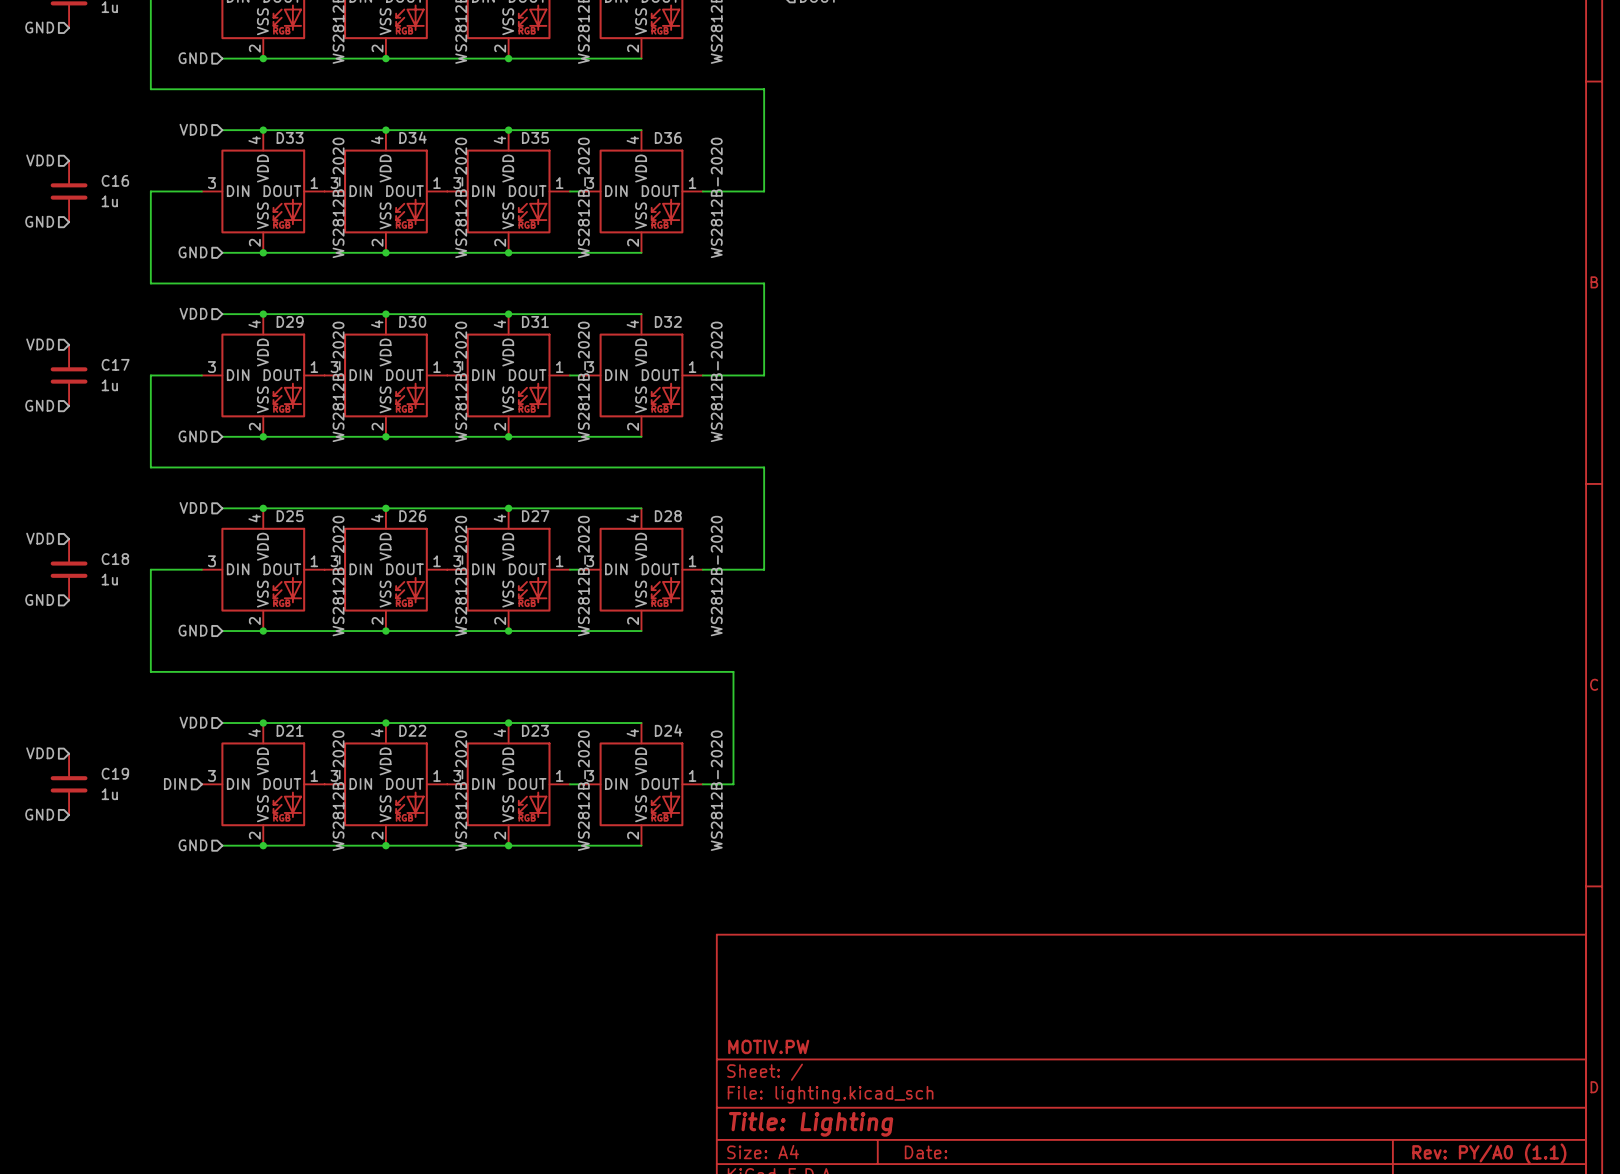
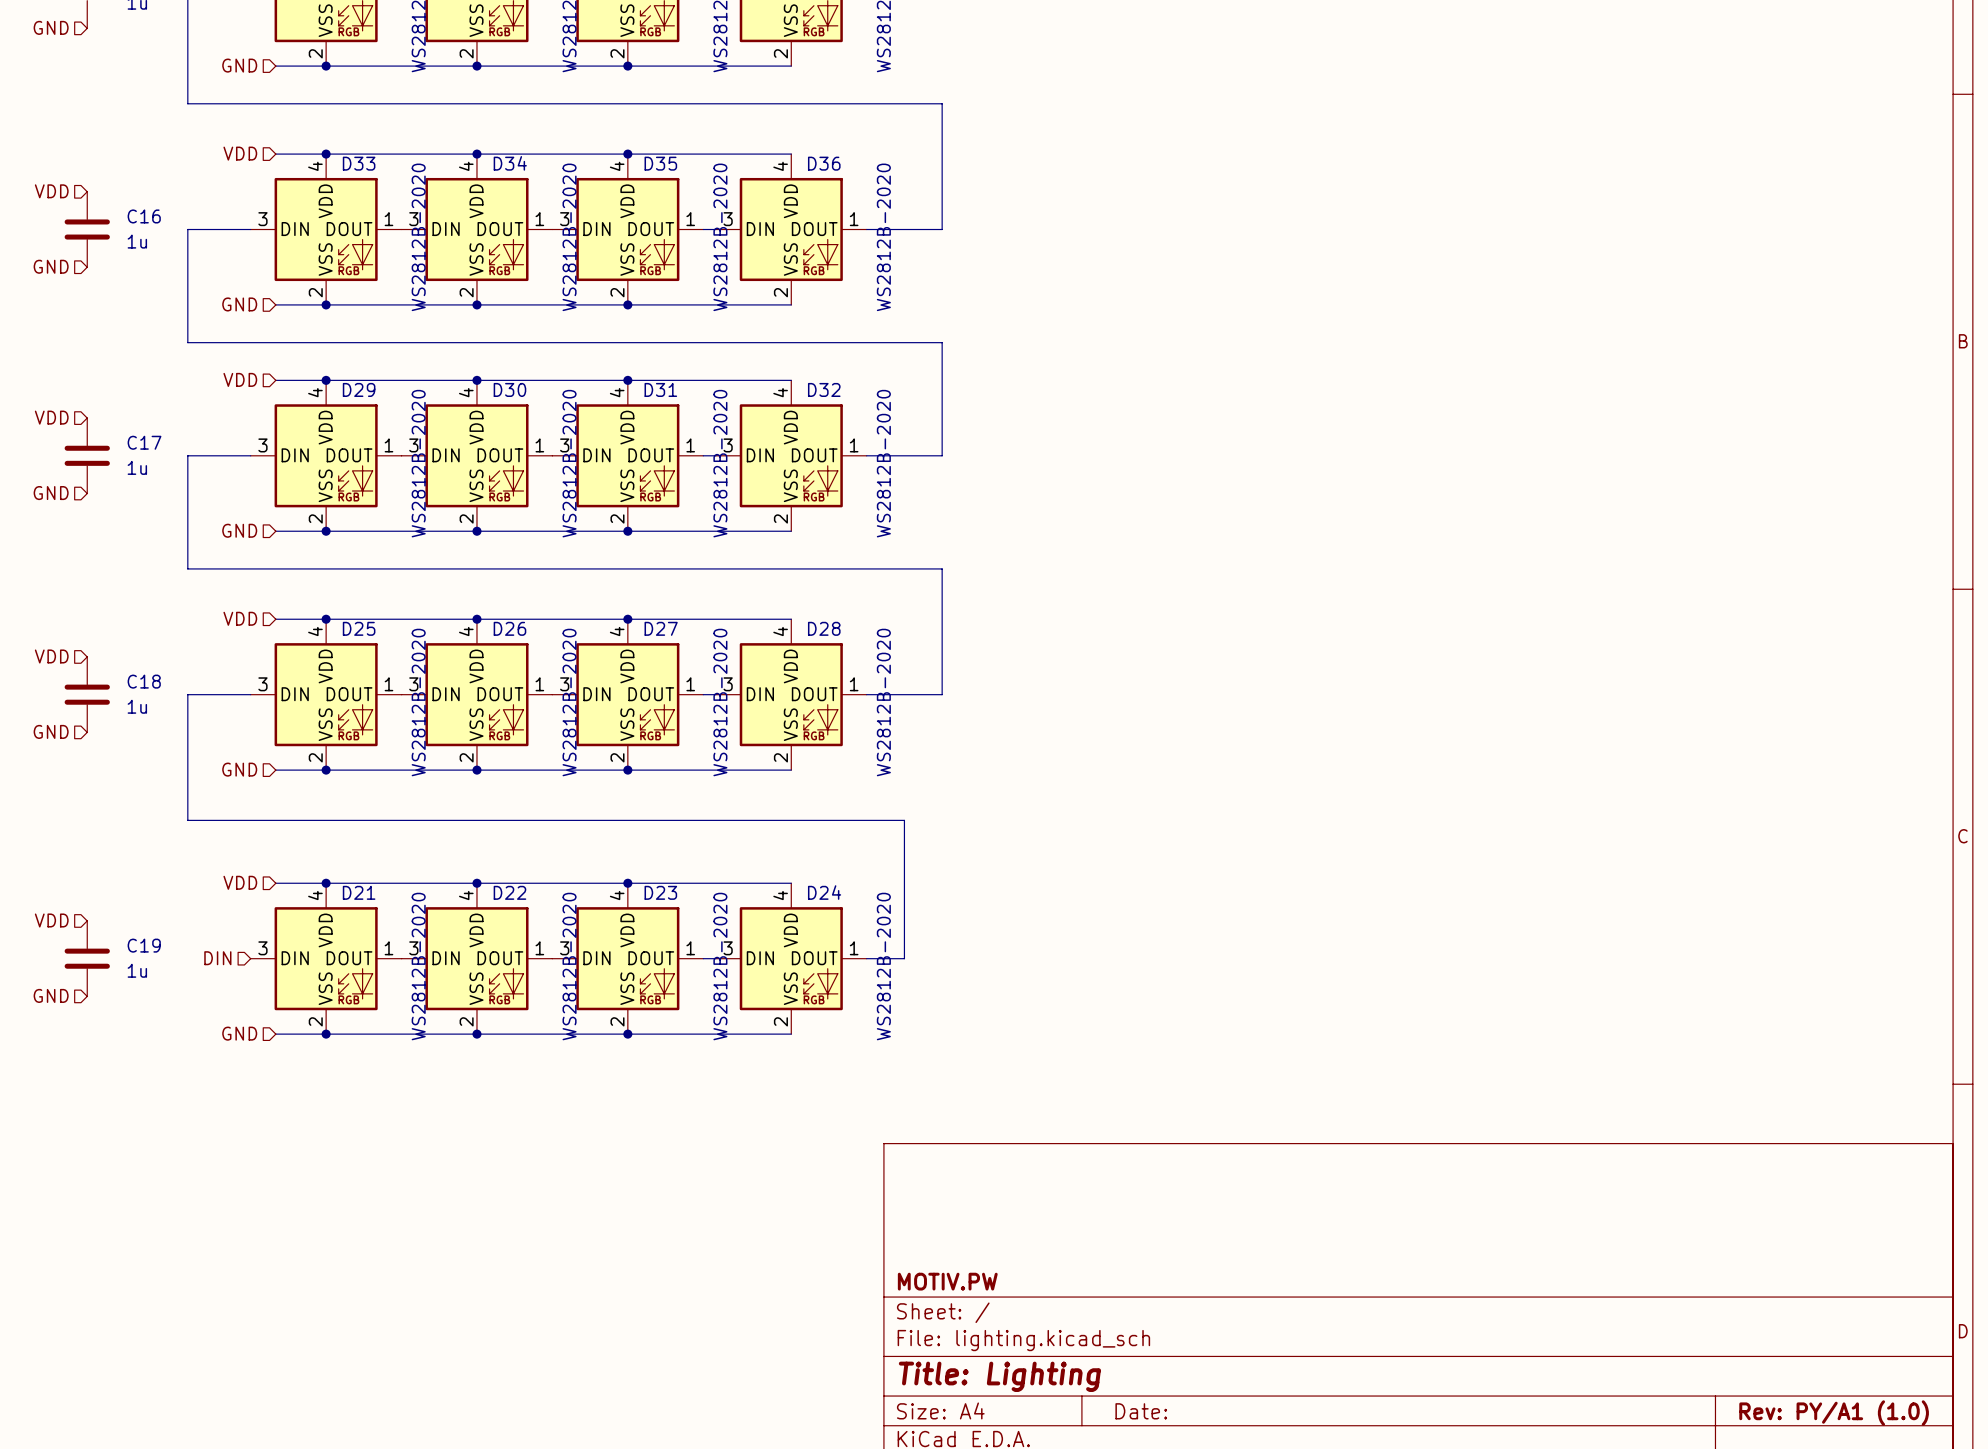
title block: Rev: PY/A0 (1.1) (1489, 1153) -> Rev: PY/A1 (1.0) (1834, 1413)

